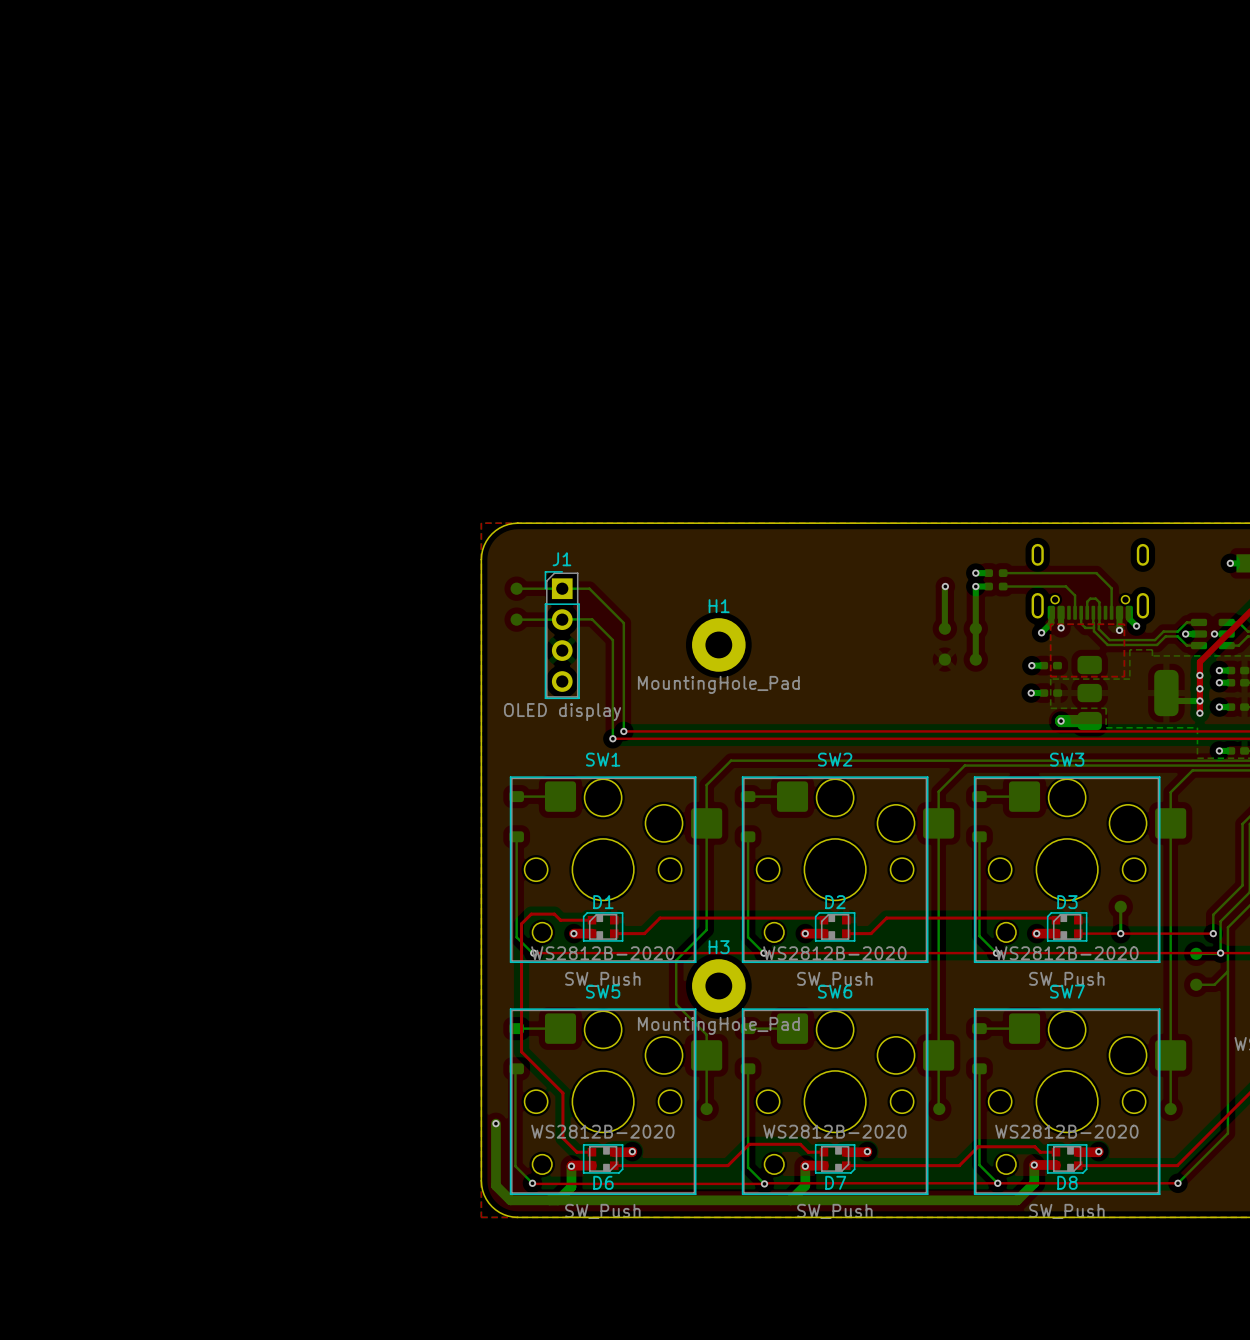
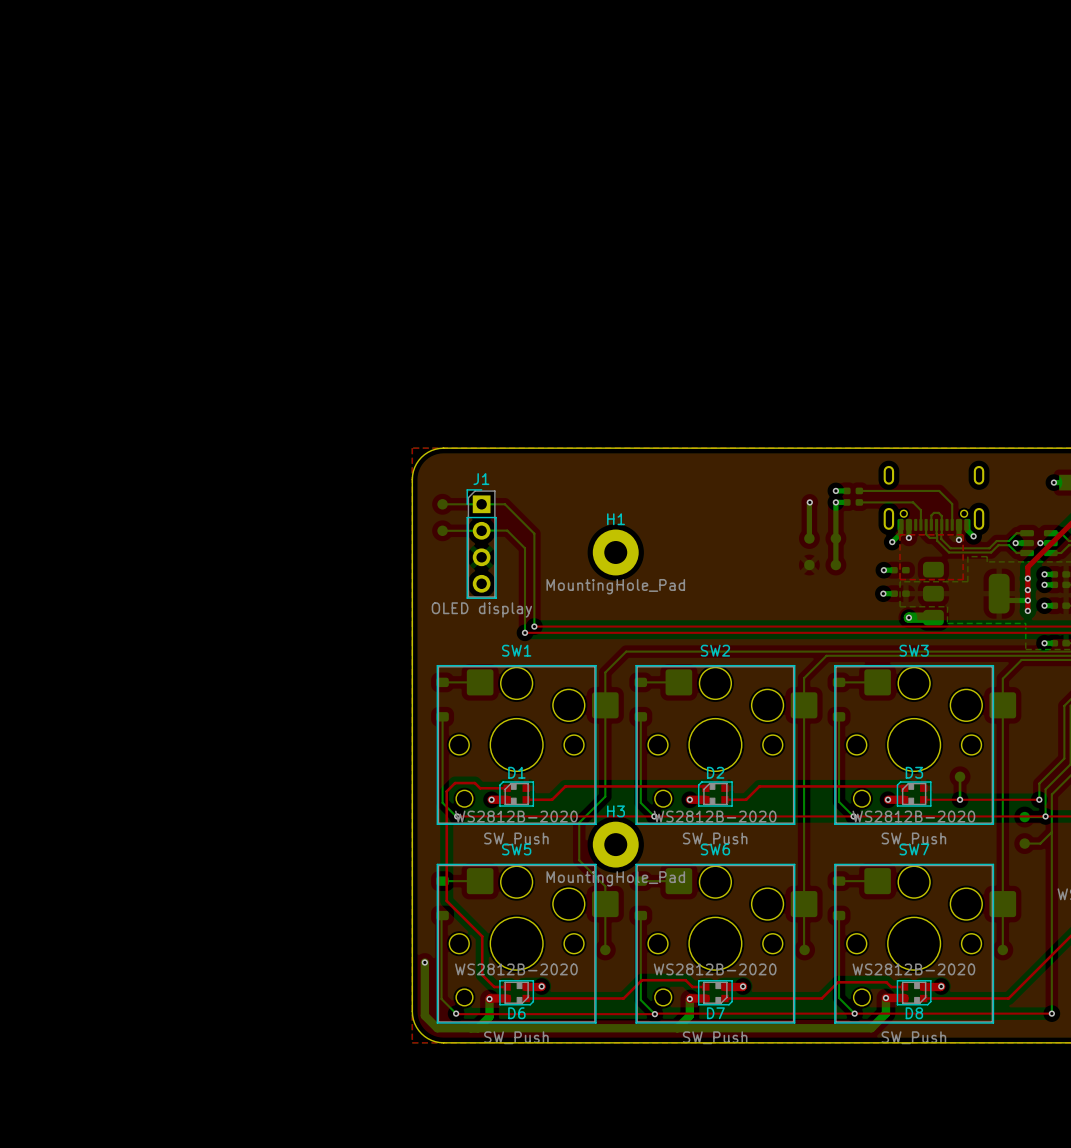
bottom track: (1227, 1133) (1177, 1183) -> (1051, 970) (1051, 1013)
top track: none -> (1009, 1013) (1051, 1013)
via position: (1177, 1183) -> (1051, 1013)

